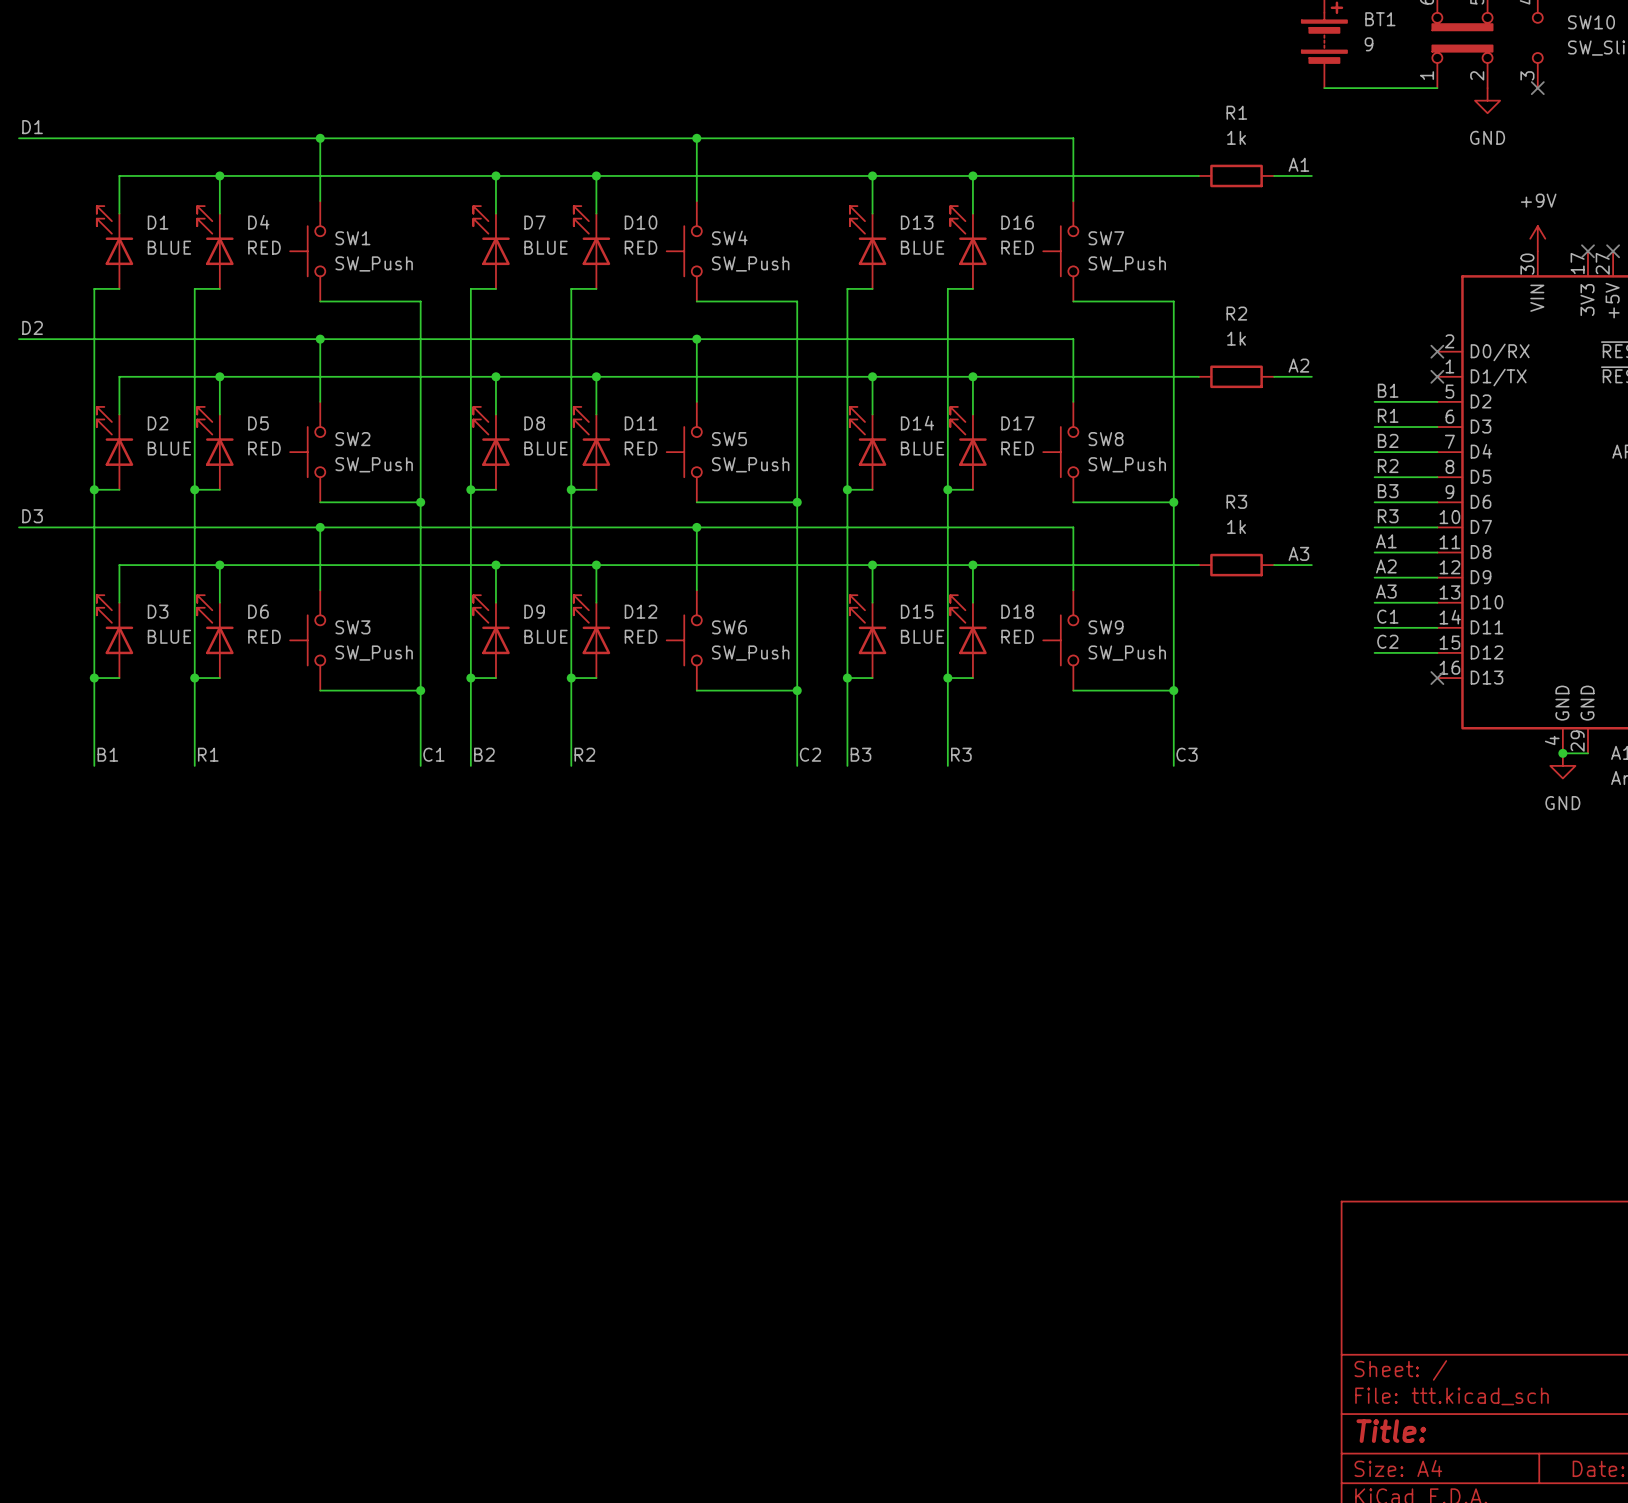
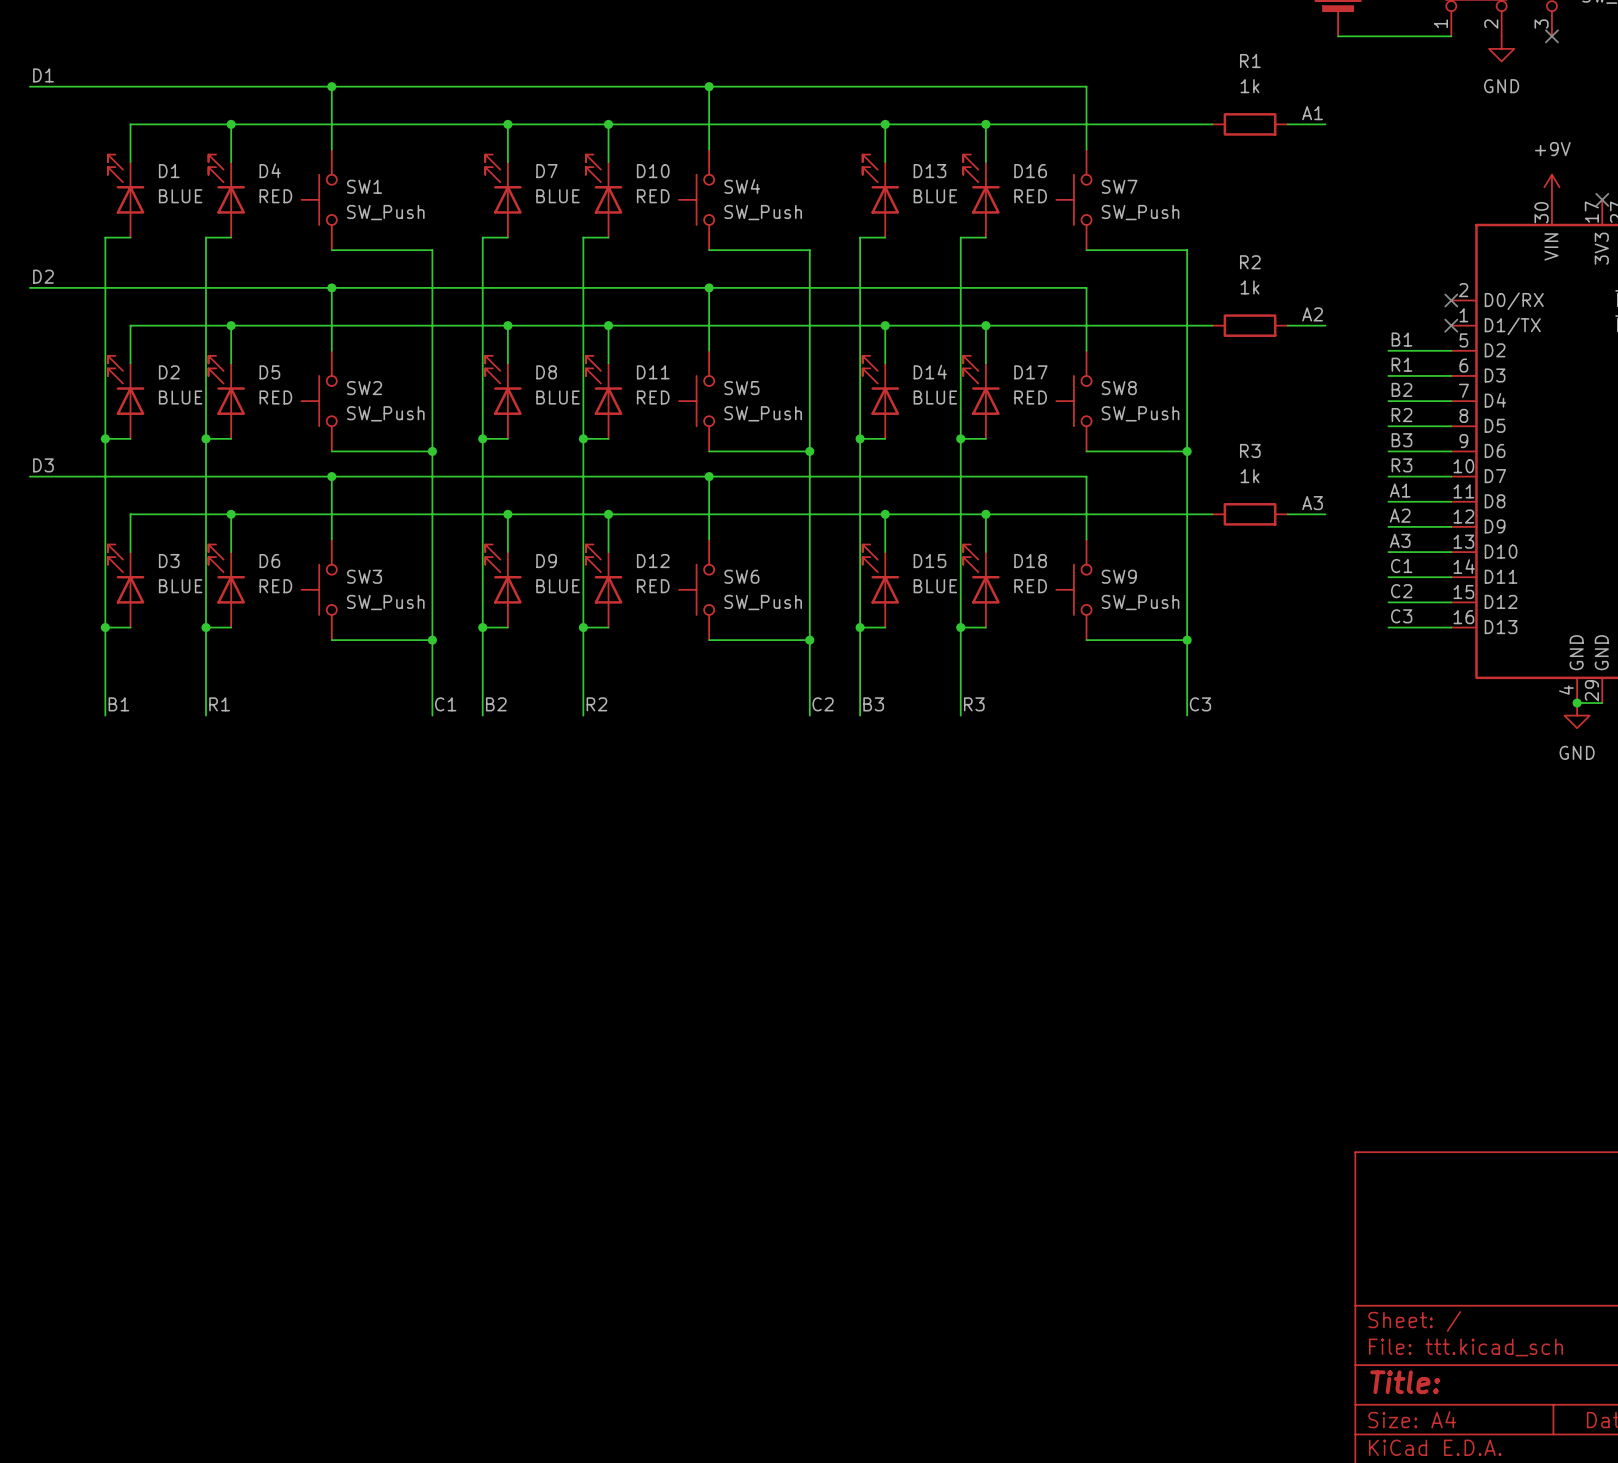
label: none -> C3 (1401, 616)
wire: none -> (1388, 627) (1451, 627)
no-connect mark: (1437, 678) -> none

